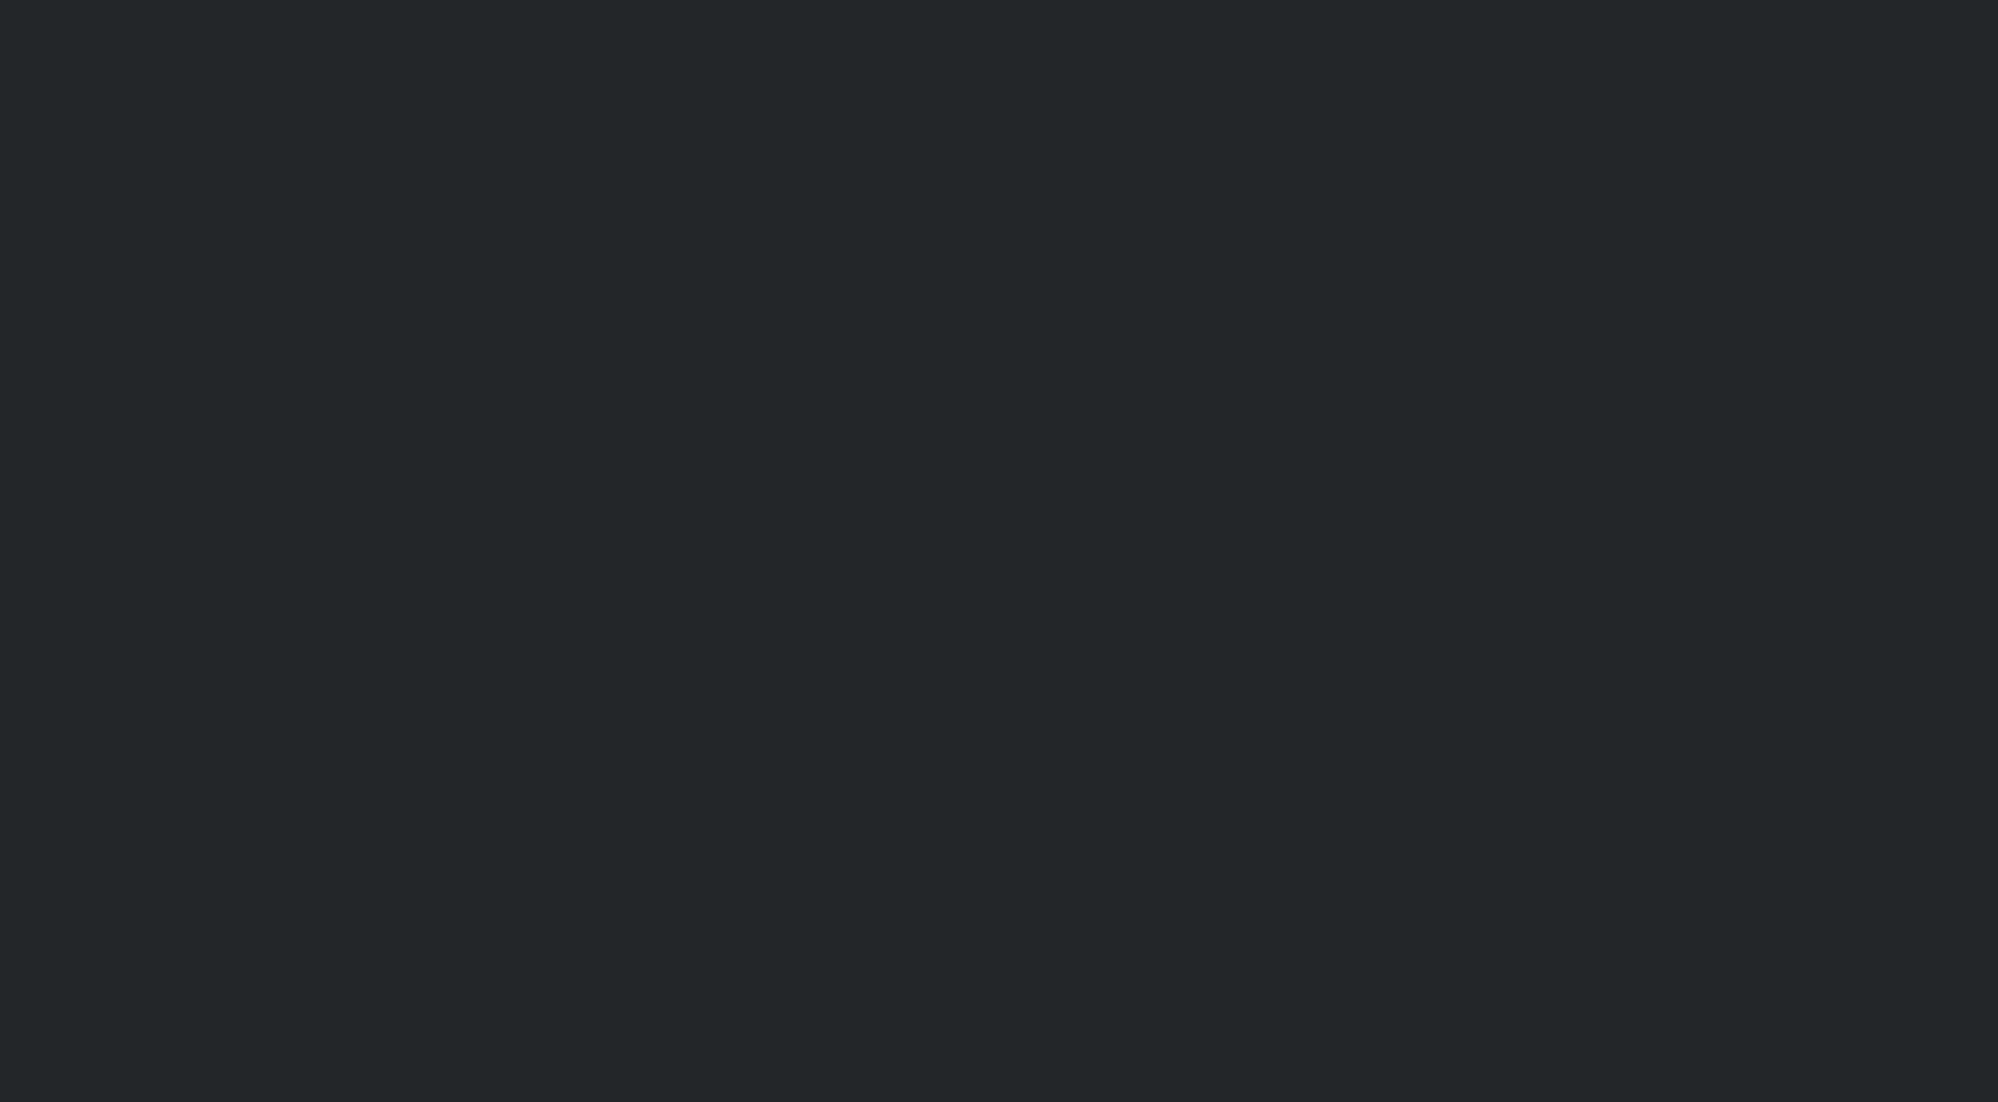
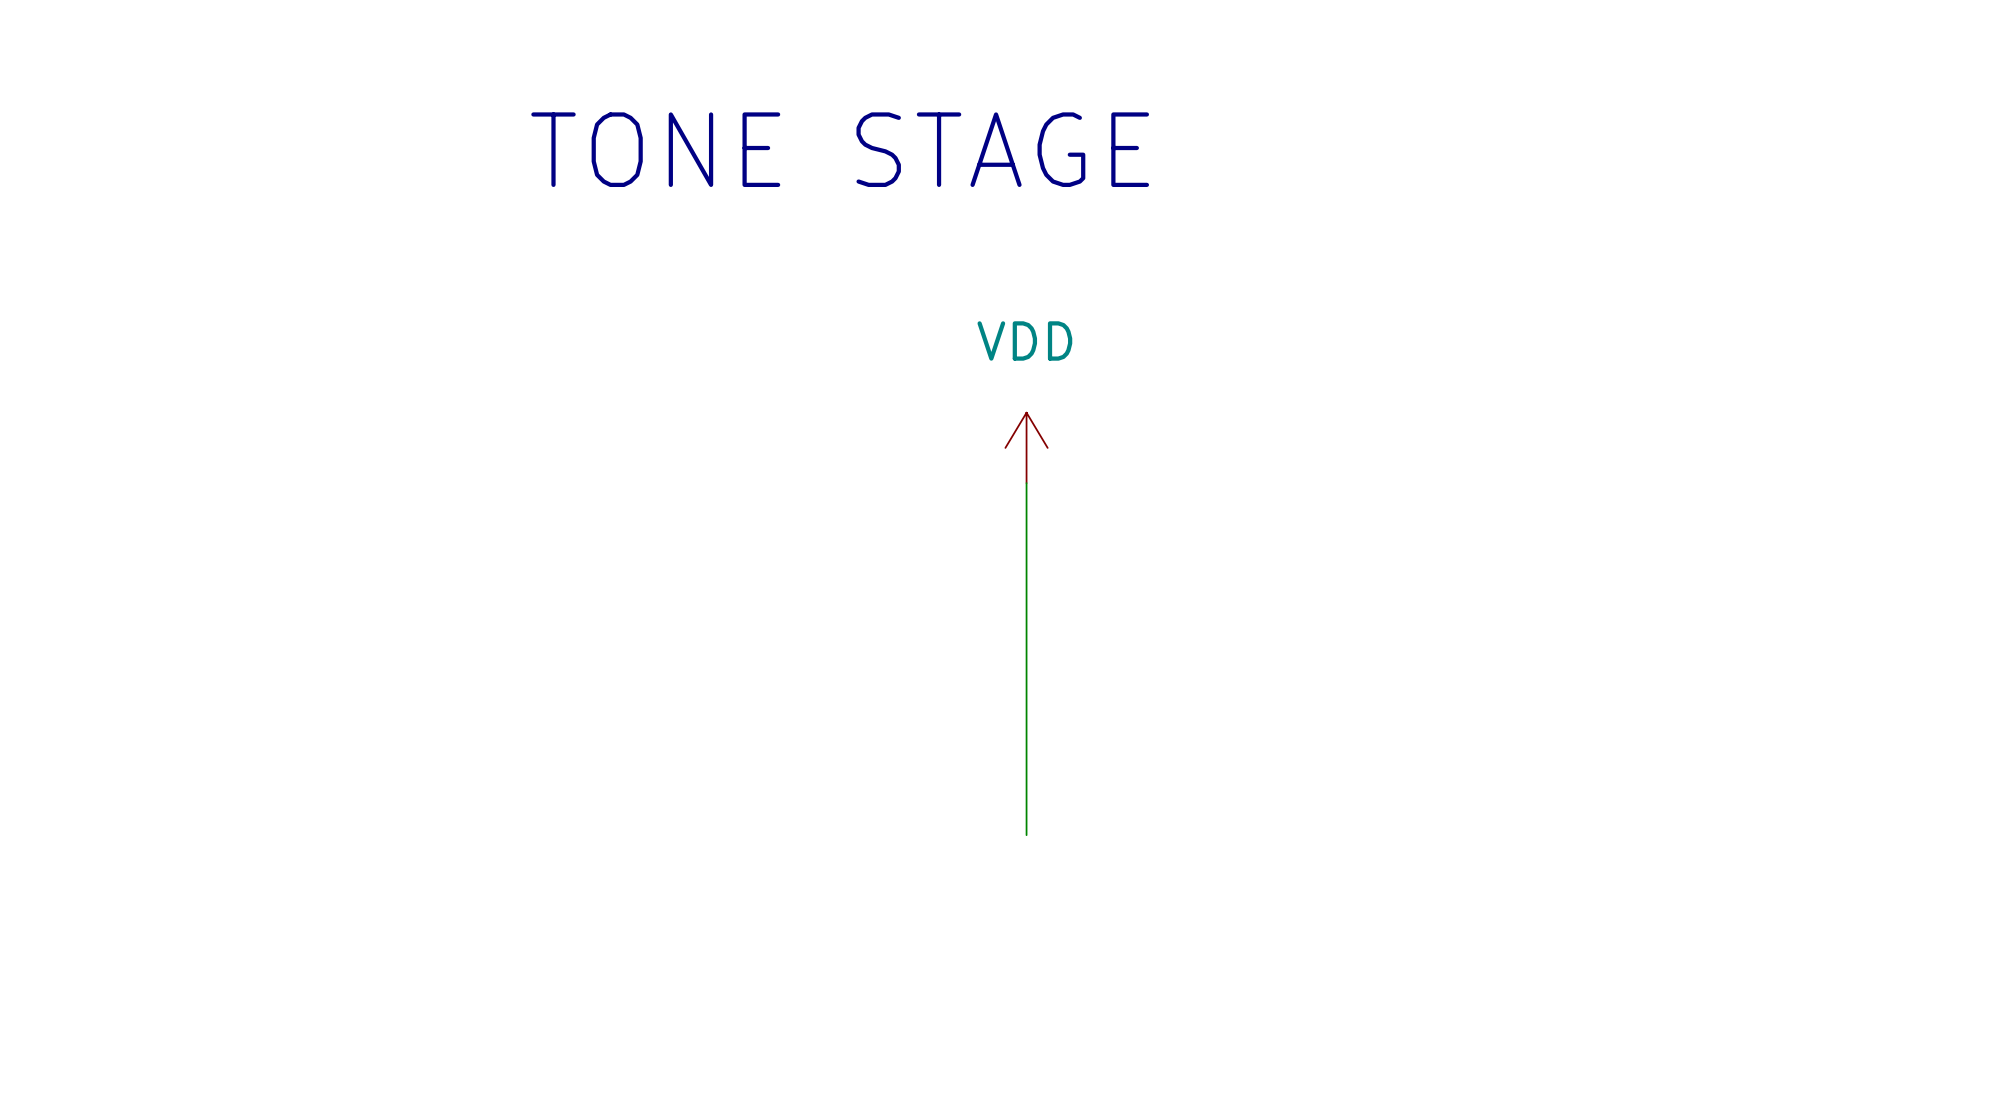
text: none -> TONE STAGE (840, 149)
power symbol: none -> VDD (1026, 447)
wire: none -> (1026, 483) (1026, 835)

